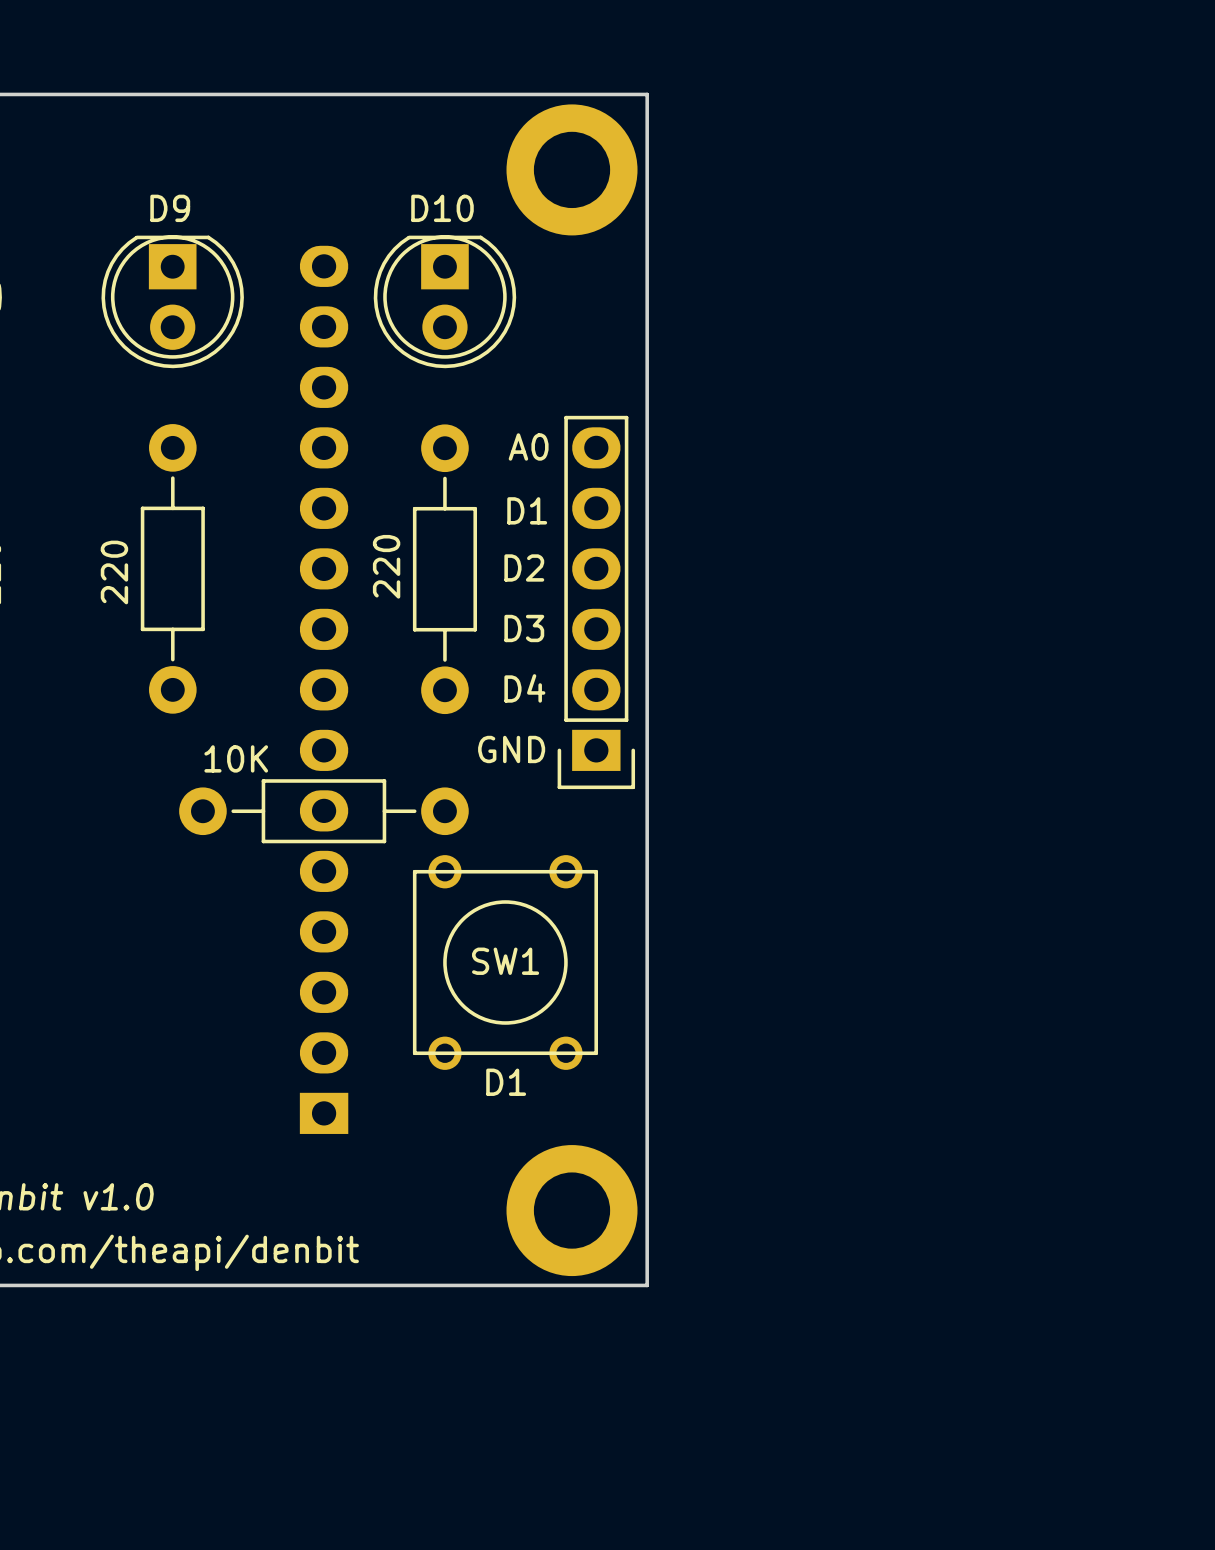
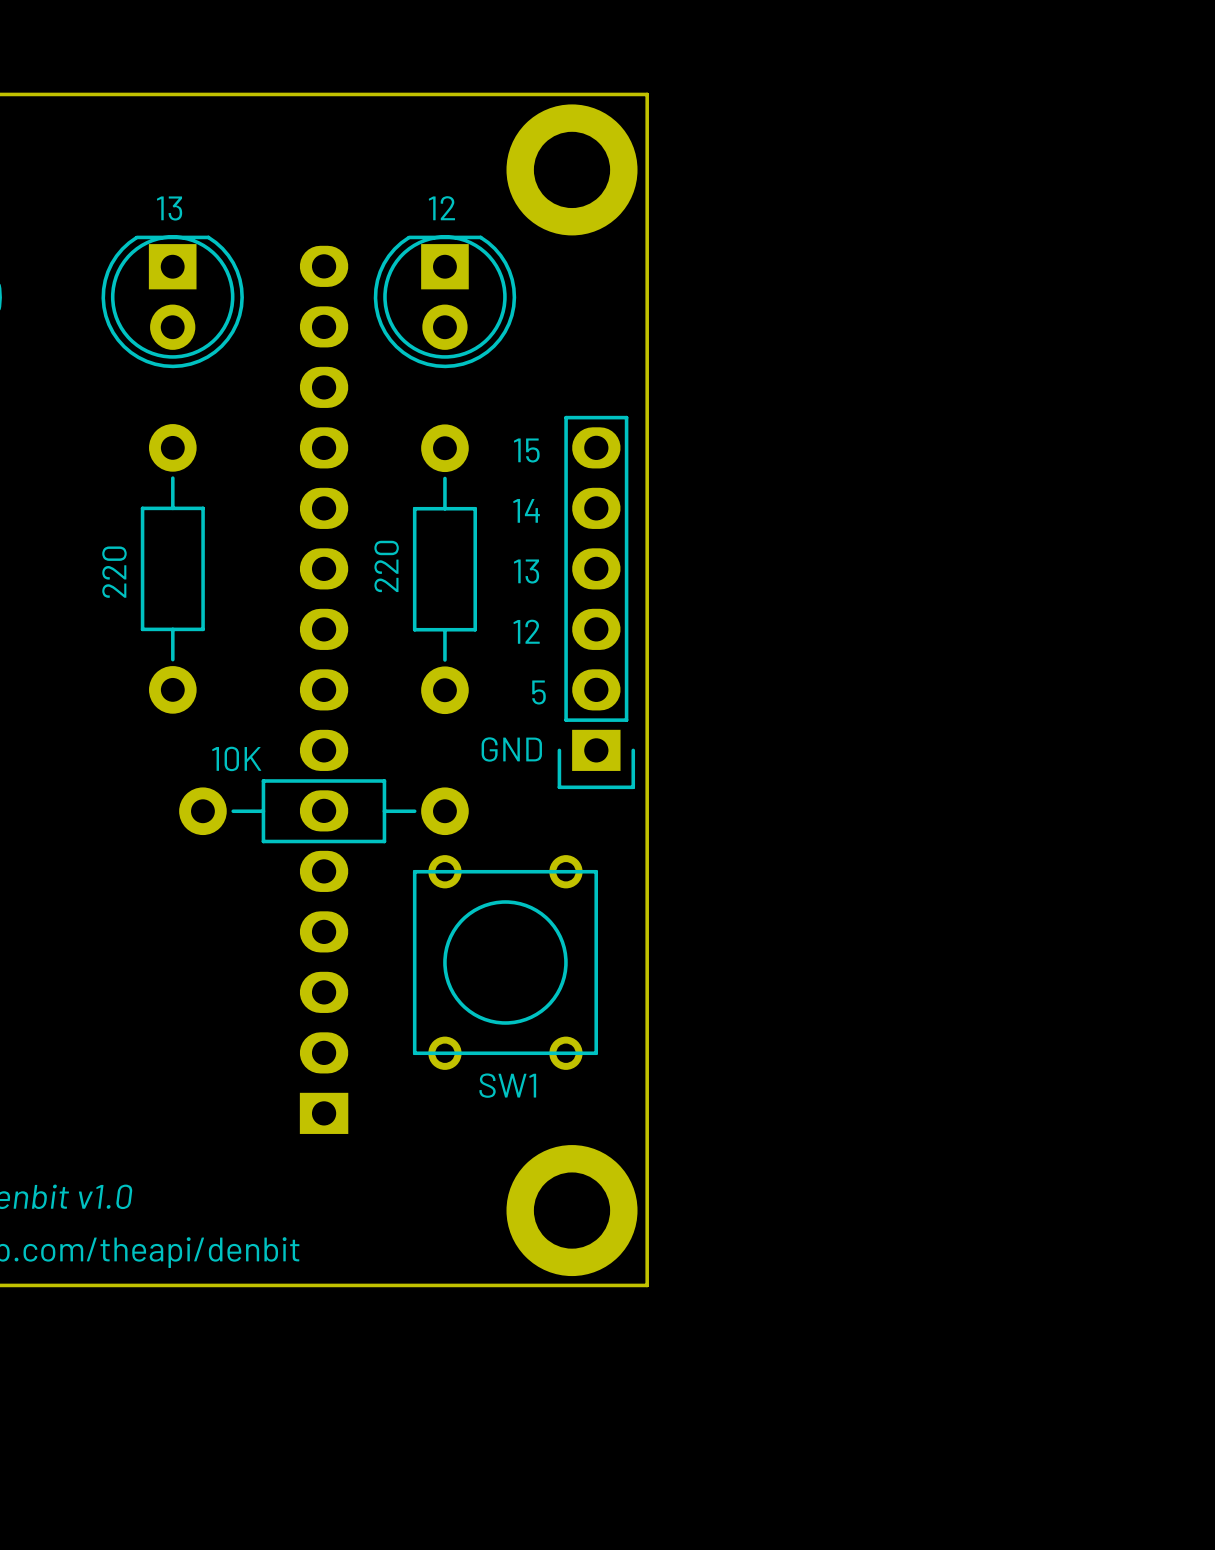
text: D9 (170, 208) -> 13 (169, 208)
text: D10 (442, 208) -> 12 (441, 208)
text: A0 (528, 446) -> 15 (526, 450)
text: D1 (527, 510) -> 14 (526, 510)
text: D2 (524, 567) -> 13 (526, 571)
text: D3 (524, 628) -> 12 (526, 631)
text: D4 (524, 688) -> 5 (539, 692)
SW1 name position: SW1 (505, 961) -> SW1 (507, 1085)
text: D1 (506, 1082) -> none

